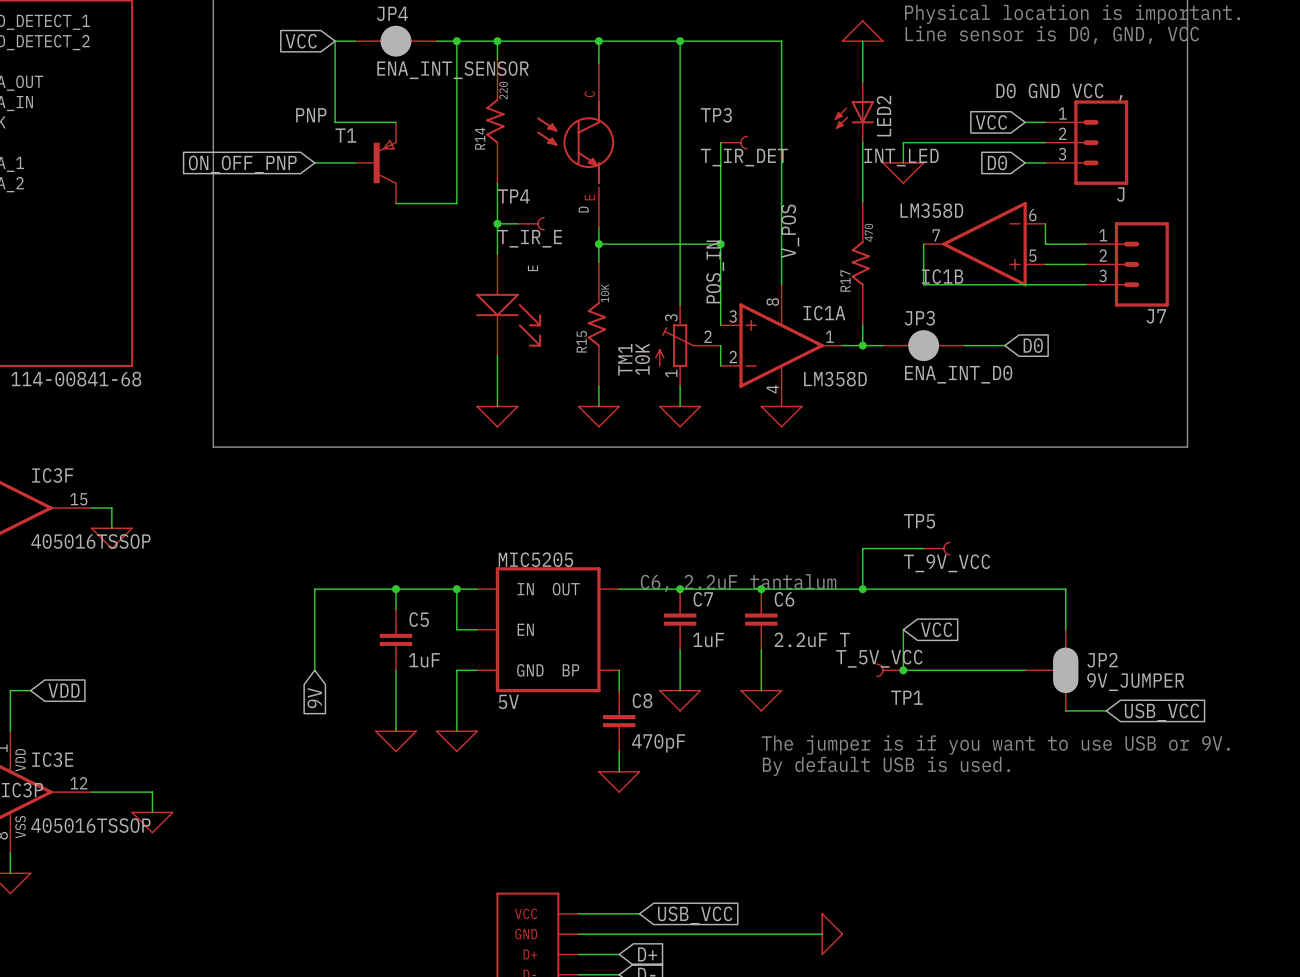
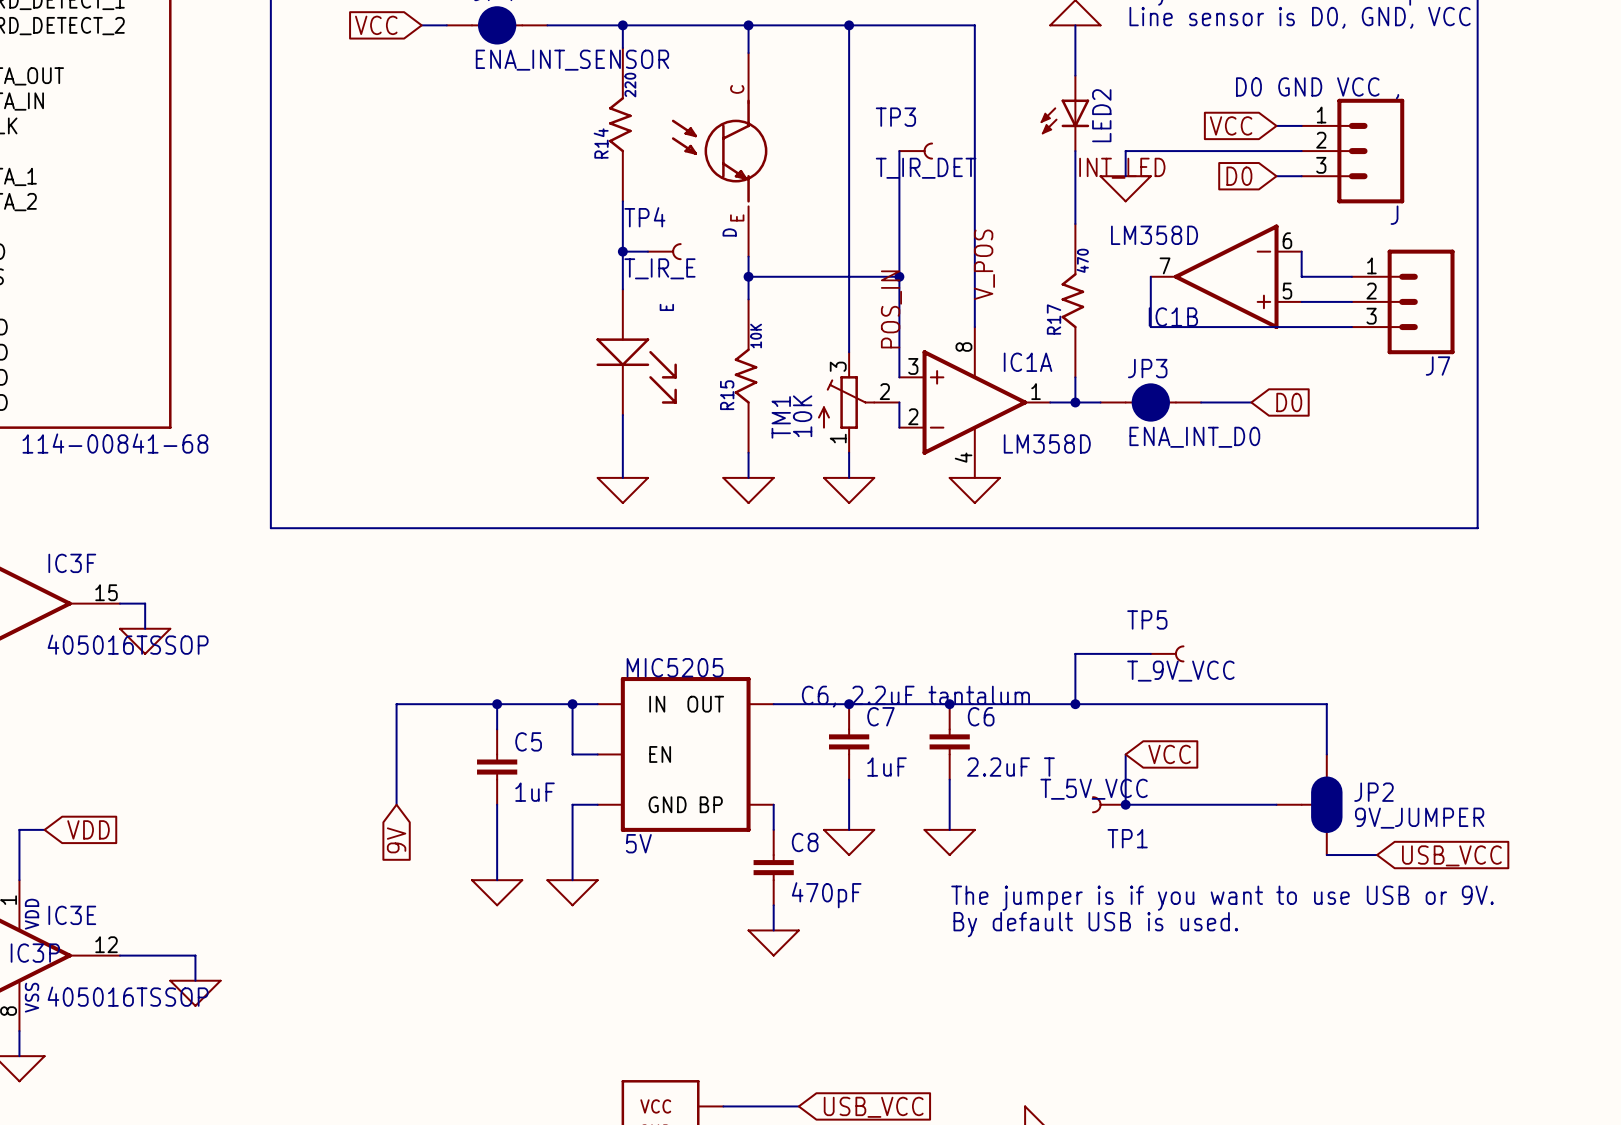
wire: (335, 41) (335, 122) (395, 122) -> none
wire: (456, 41) (456, 203) (395, 203) -> none
junction: (456, 41) -> none
wire: (314, 162) (355, 162) -> none
T1: PNP (375, 162) -> none
global label: ON_OFF_PNP (242, 164) -> none

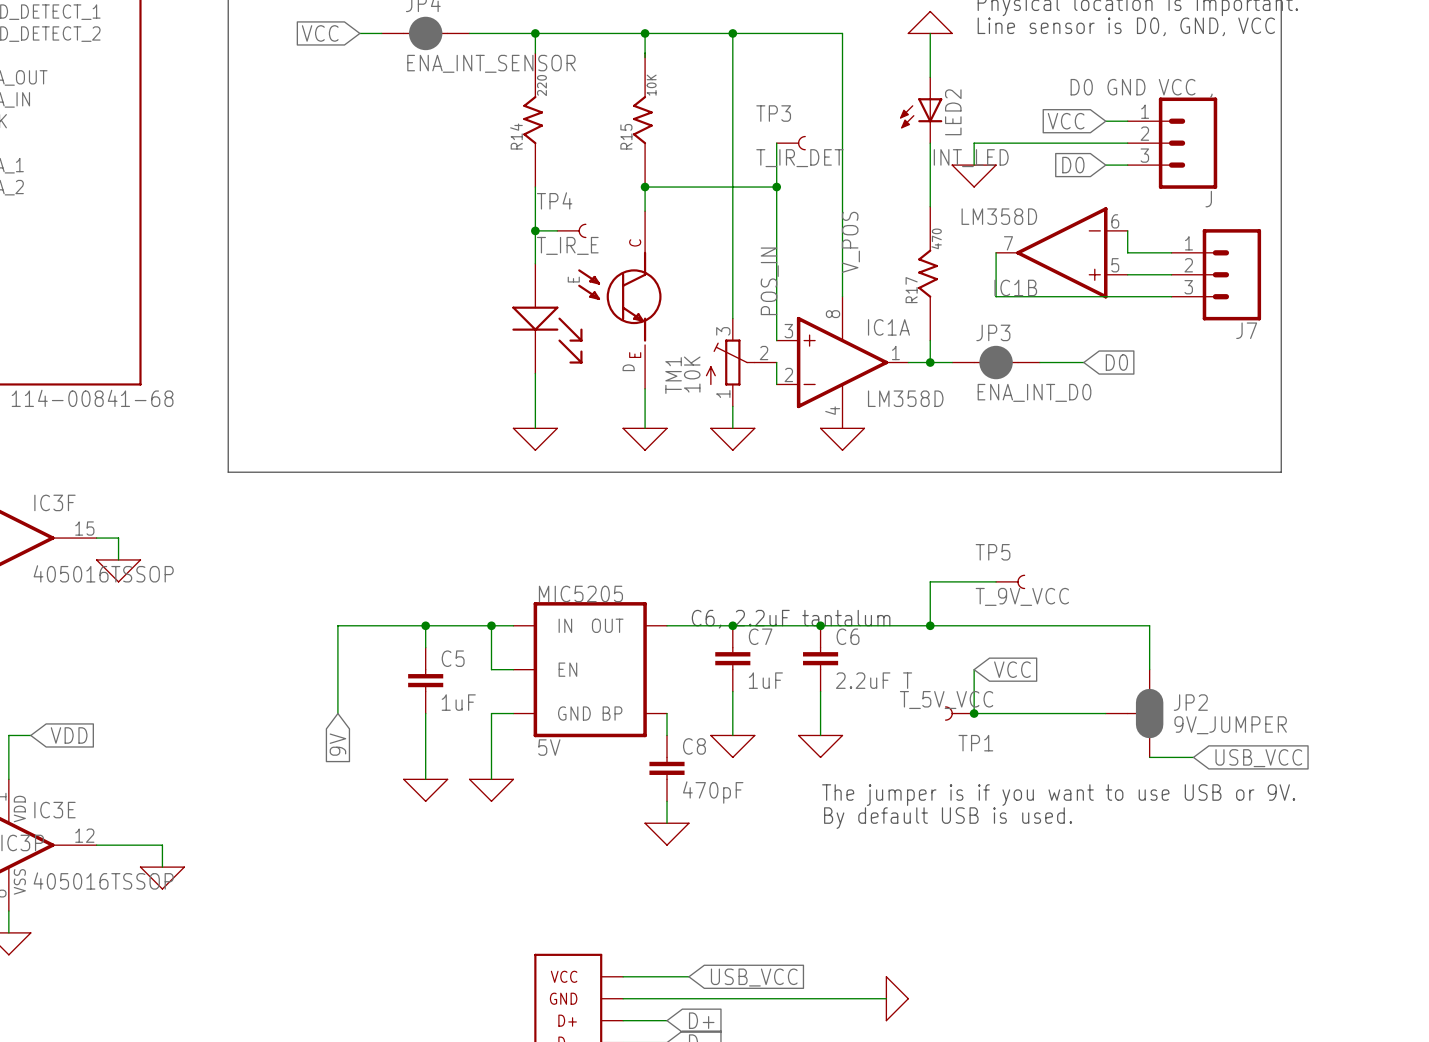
D position: (719, 154) -> (619, 300)
junction: none -> (645, 187)
wire: none -> (776, 187) (645, 187) (645, 211)
junction: none -> (776, 187)
wire: (748, 276) (899, 276) -> none
junction: (748, 276) -> none
junction: (899, 276) -> none
R15 position: (746, 376) -> (642, 120)

